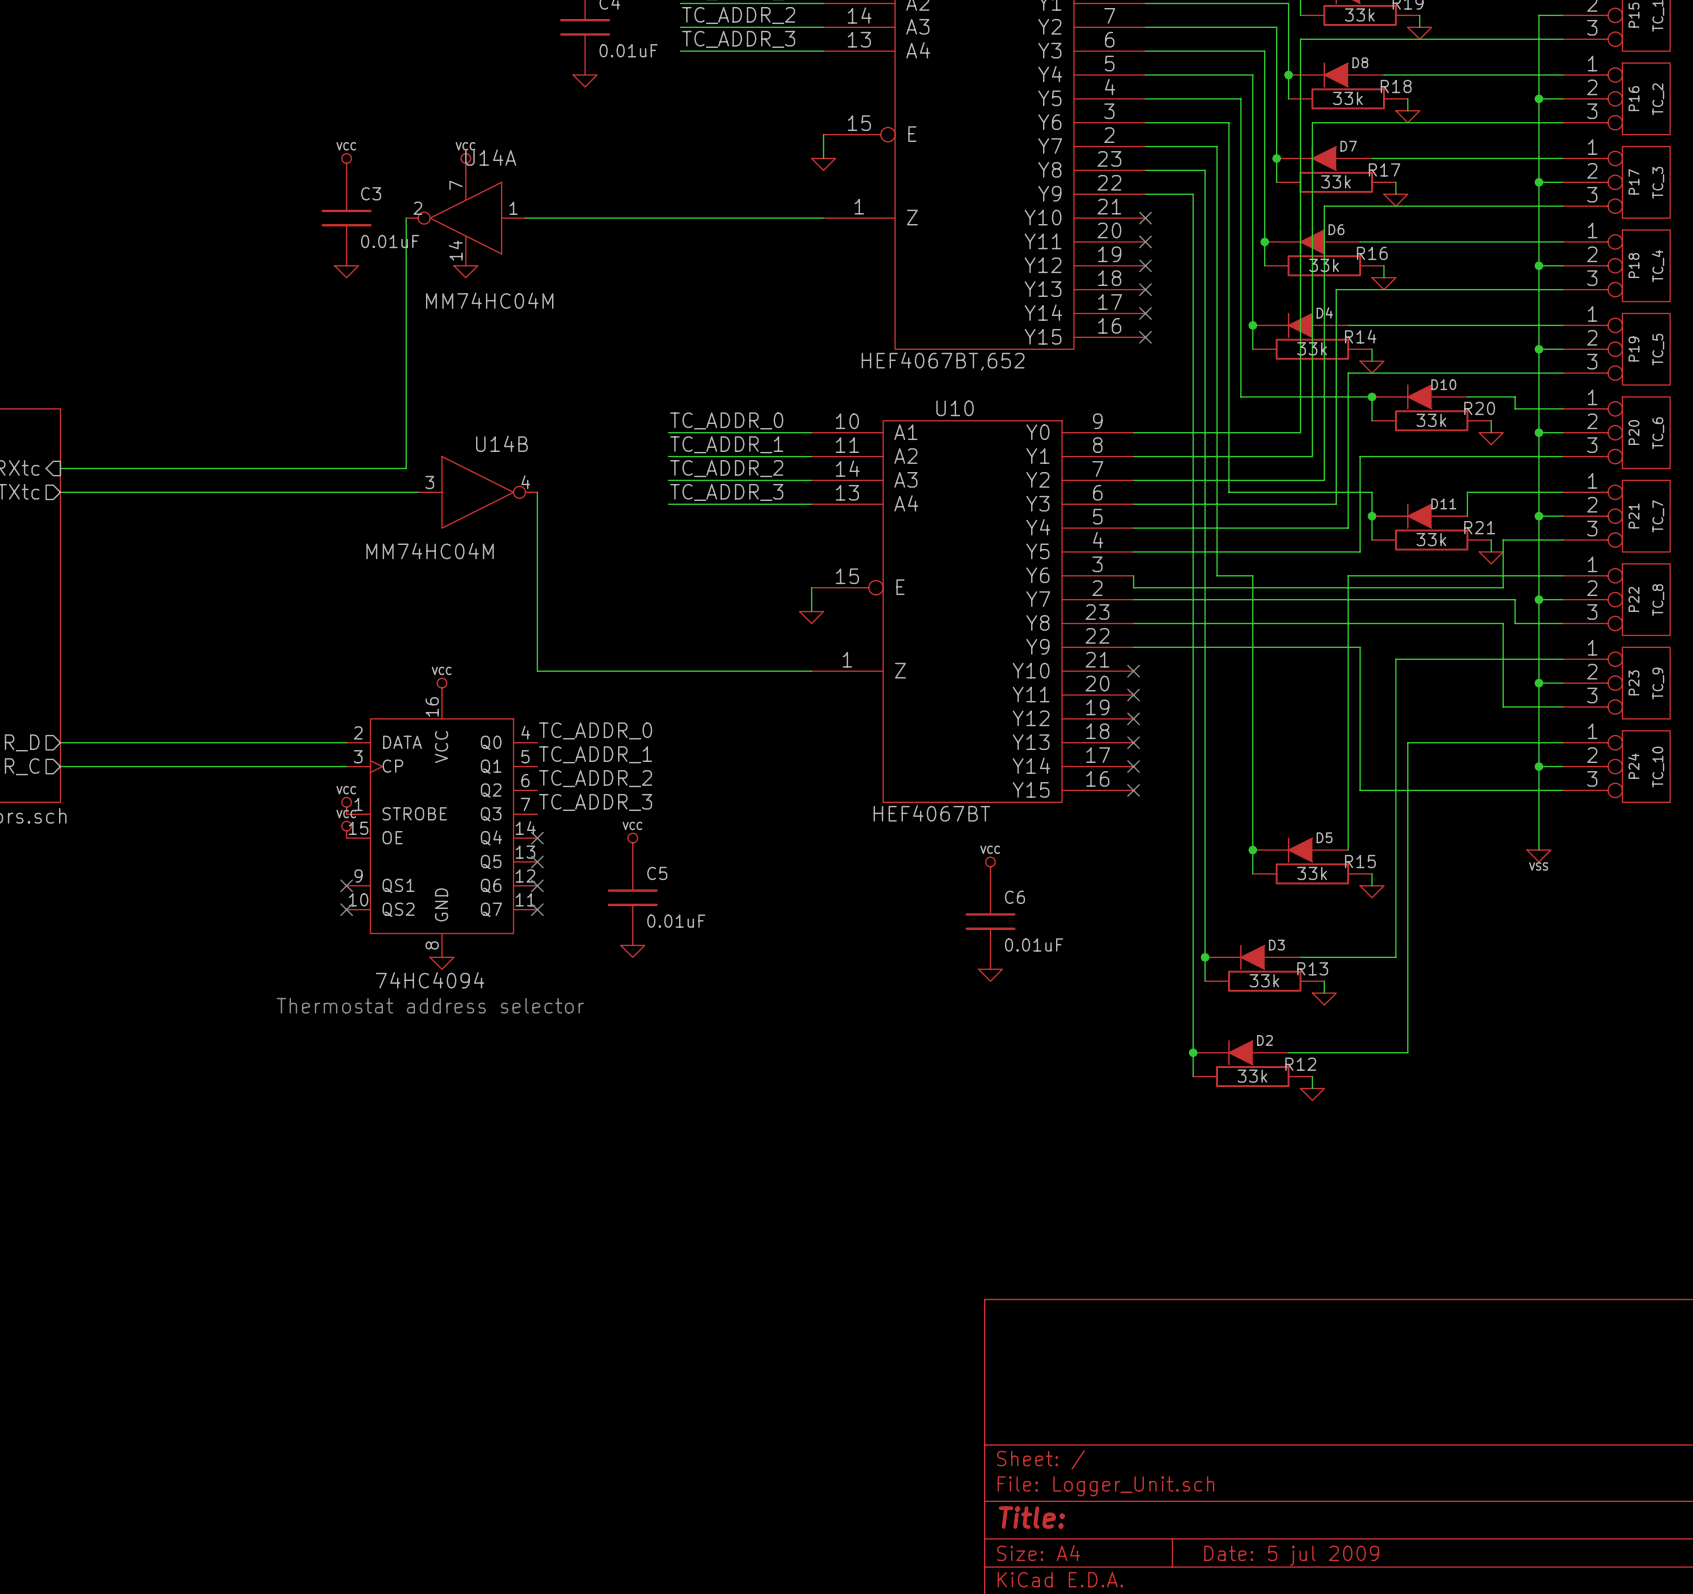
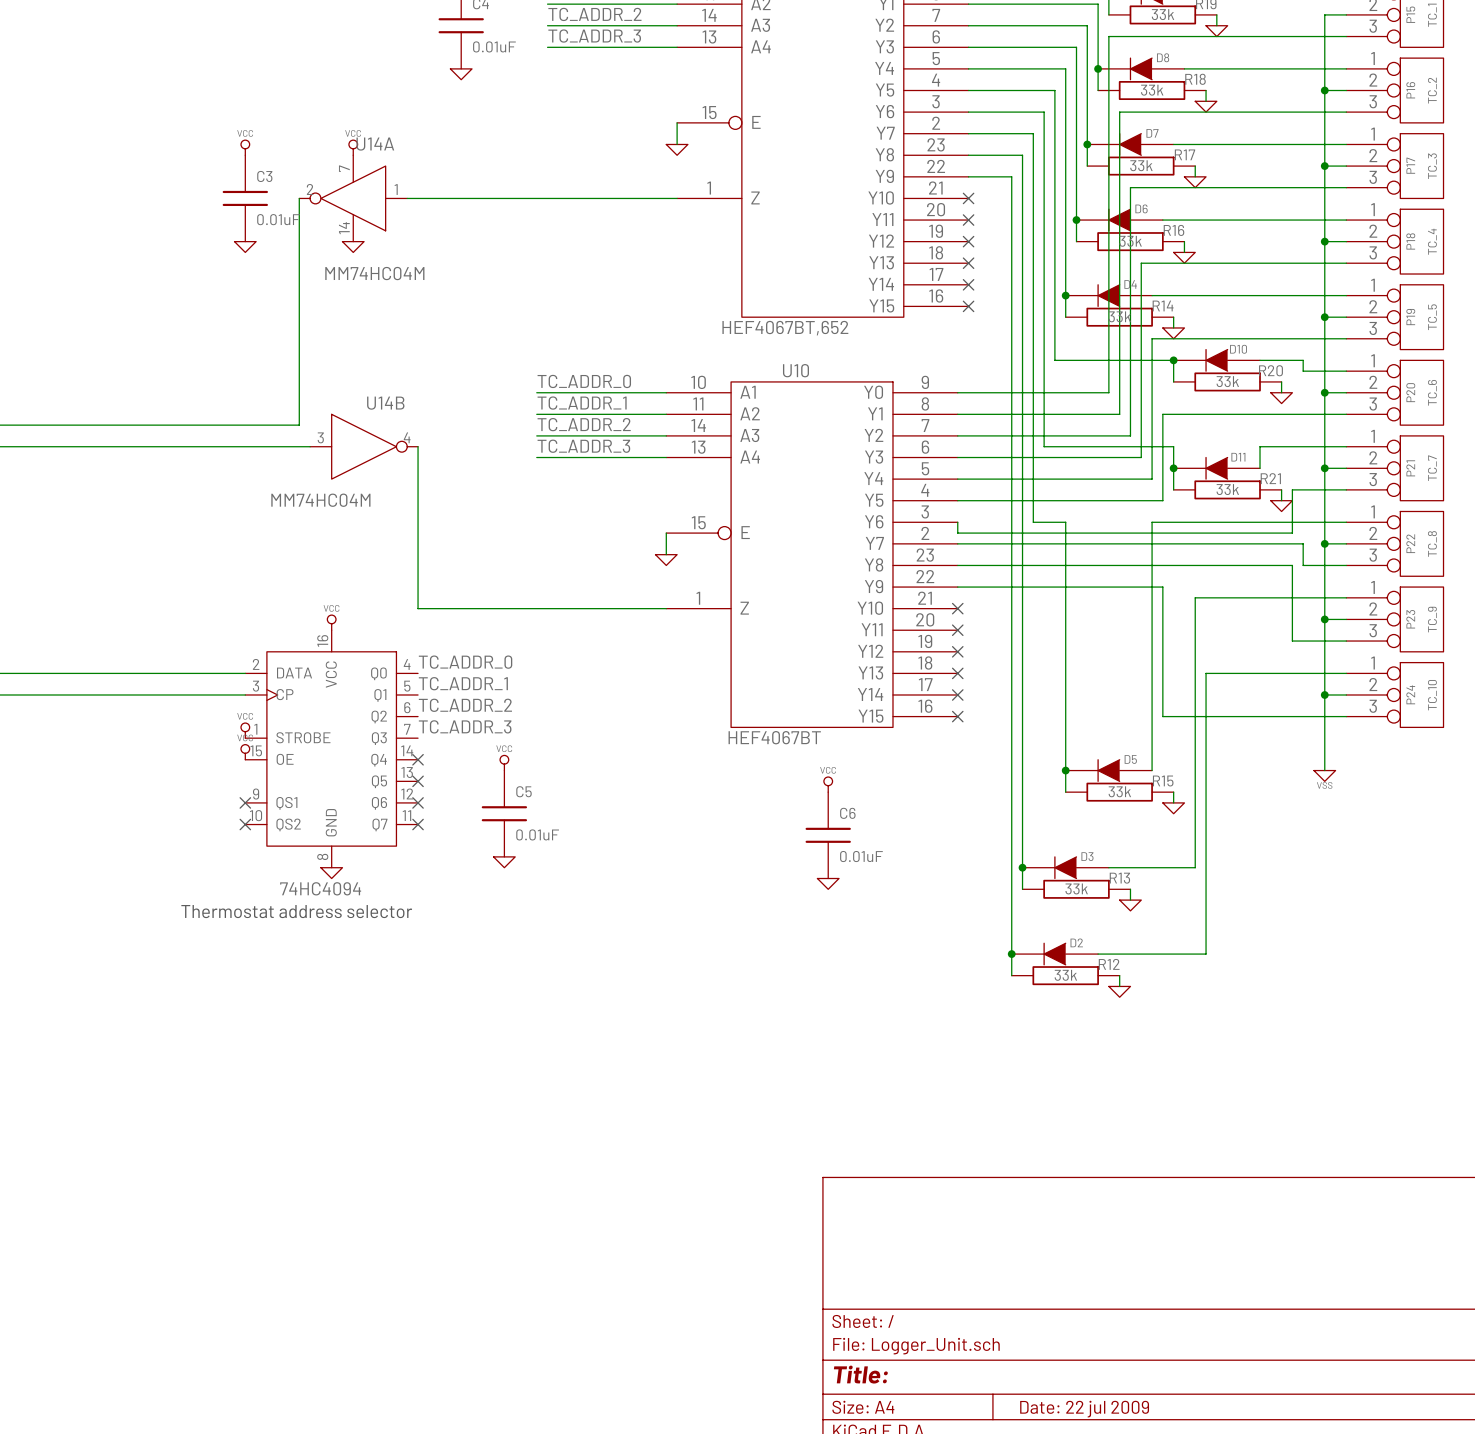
title block: Date: 5 jul 2009 (1291, 1555) -> Date: 22 jul 2009 (1084, 1409)

